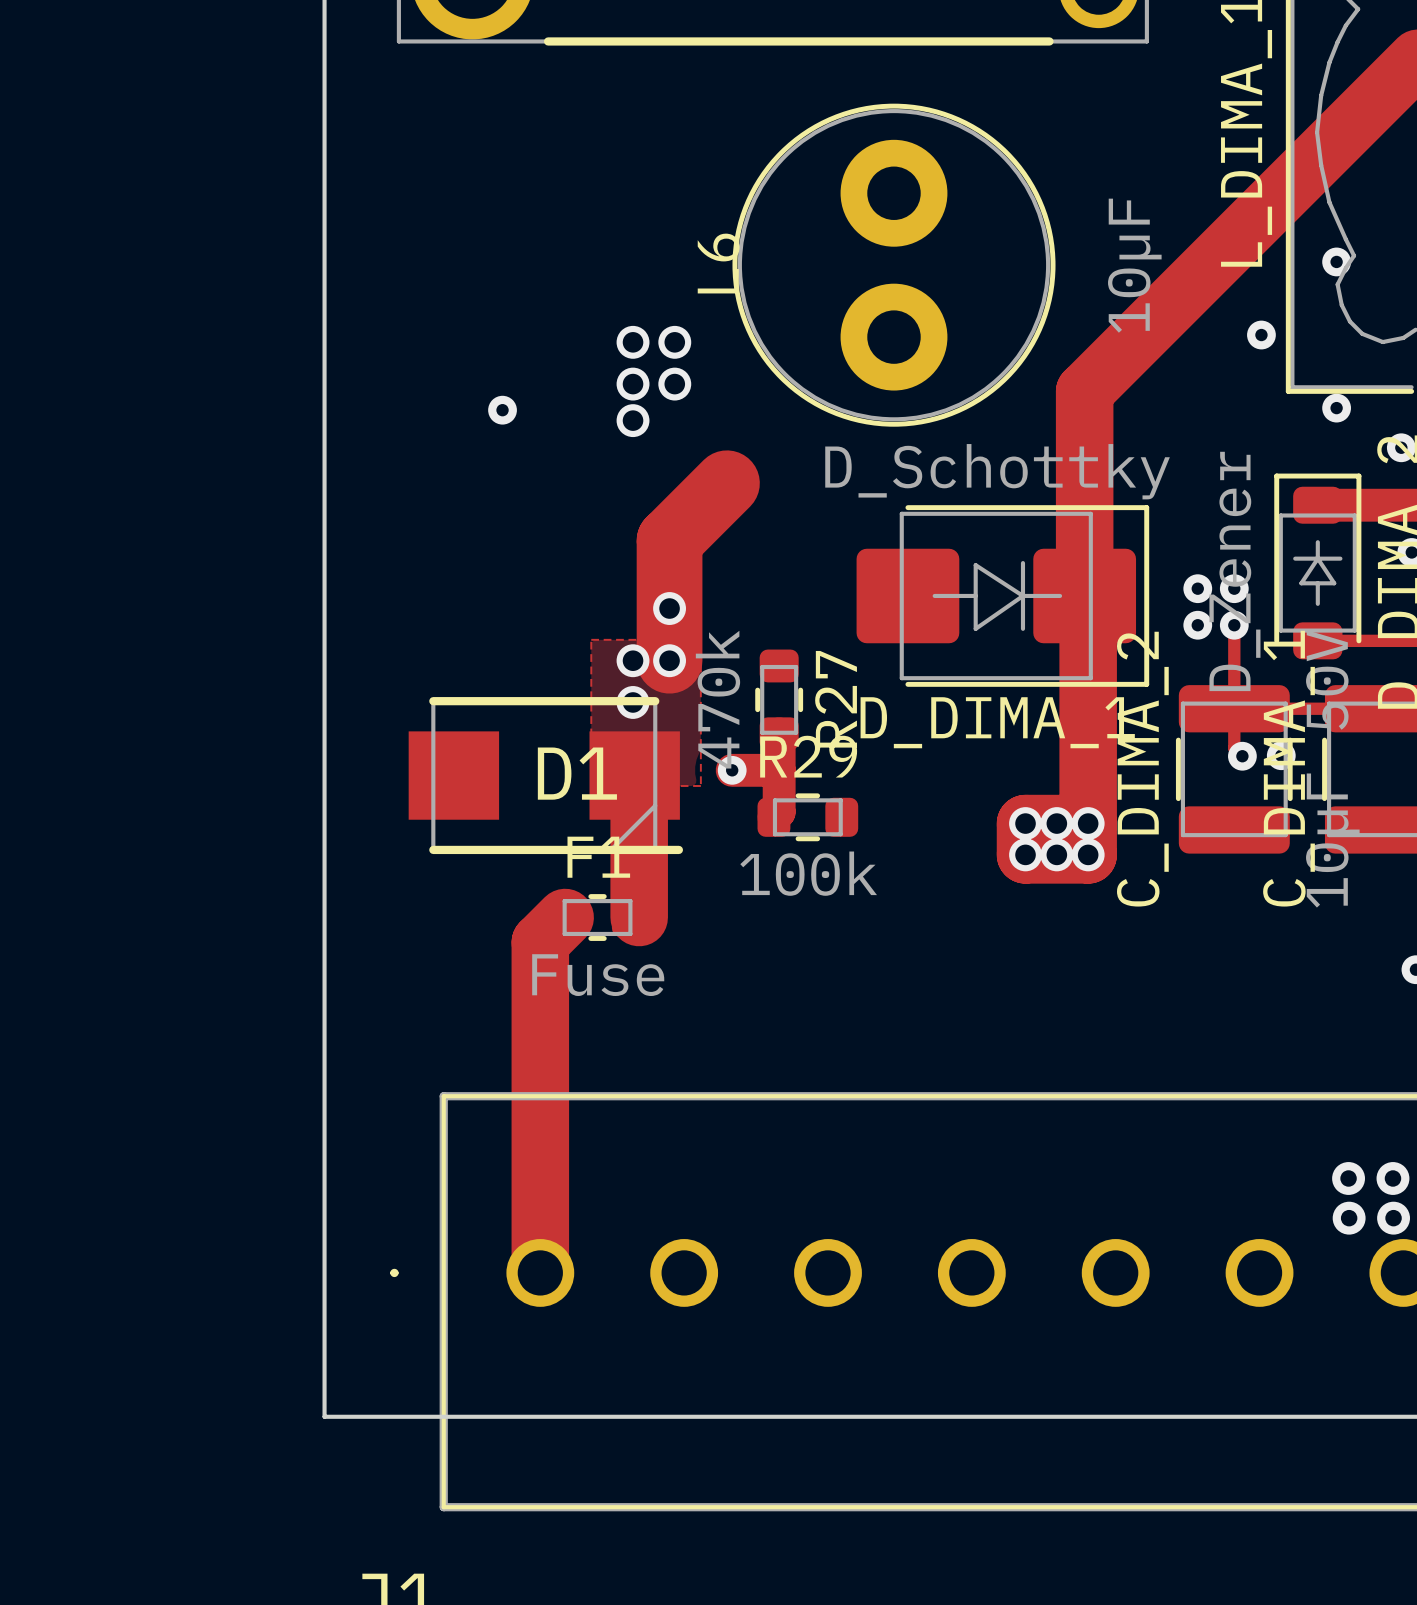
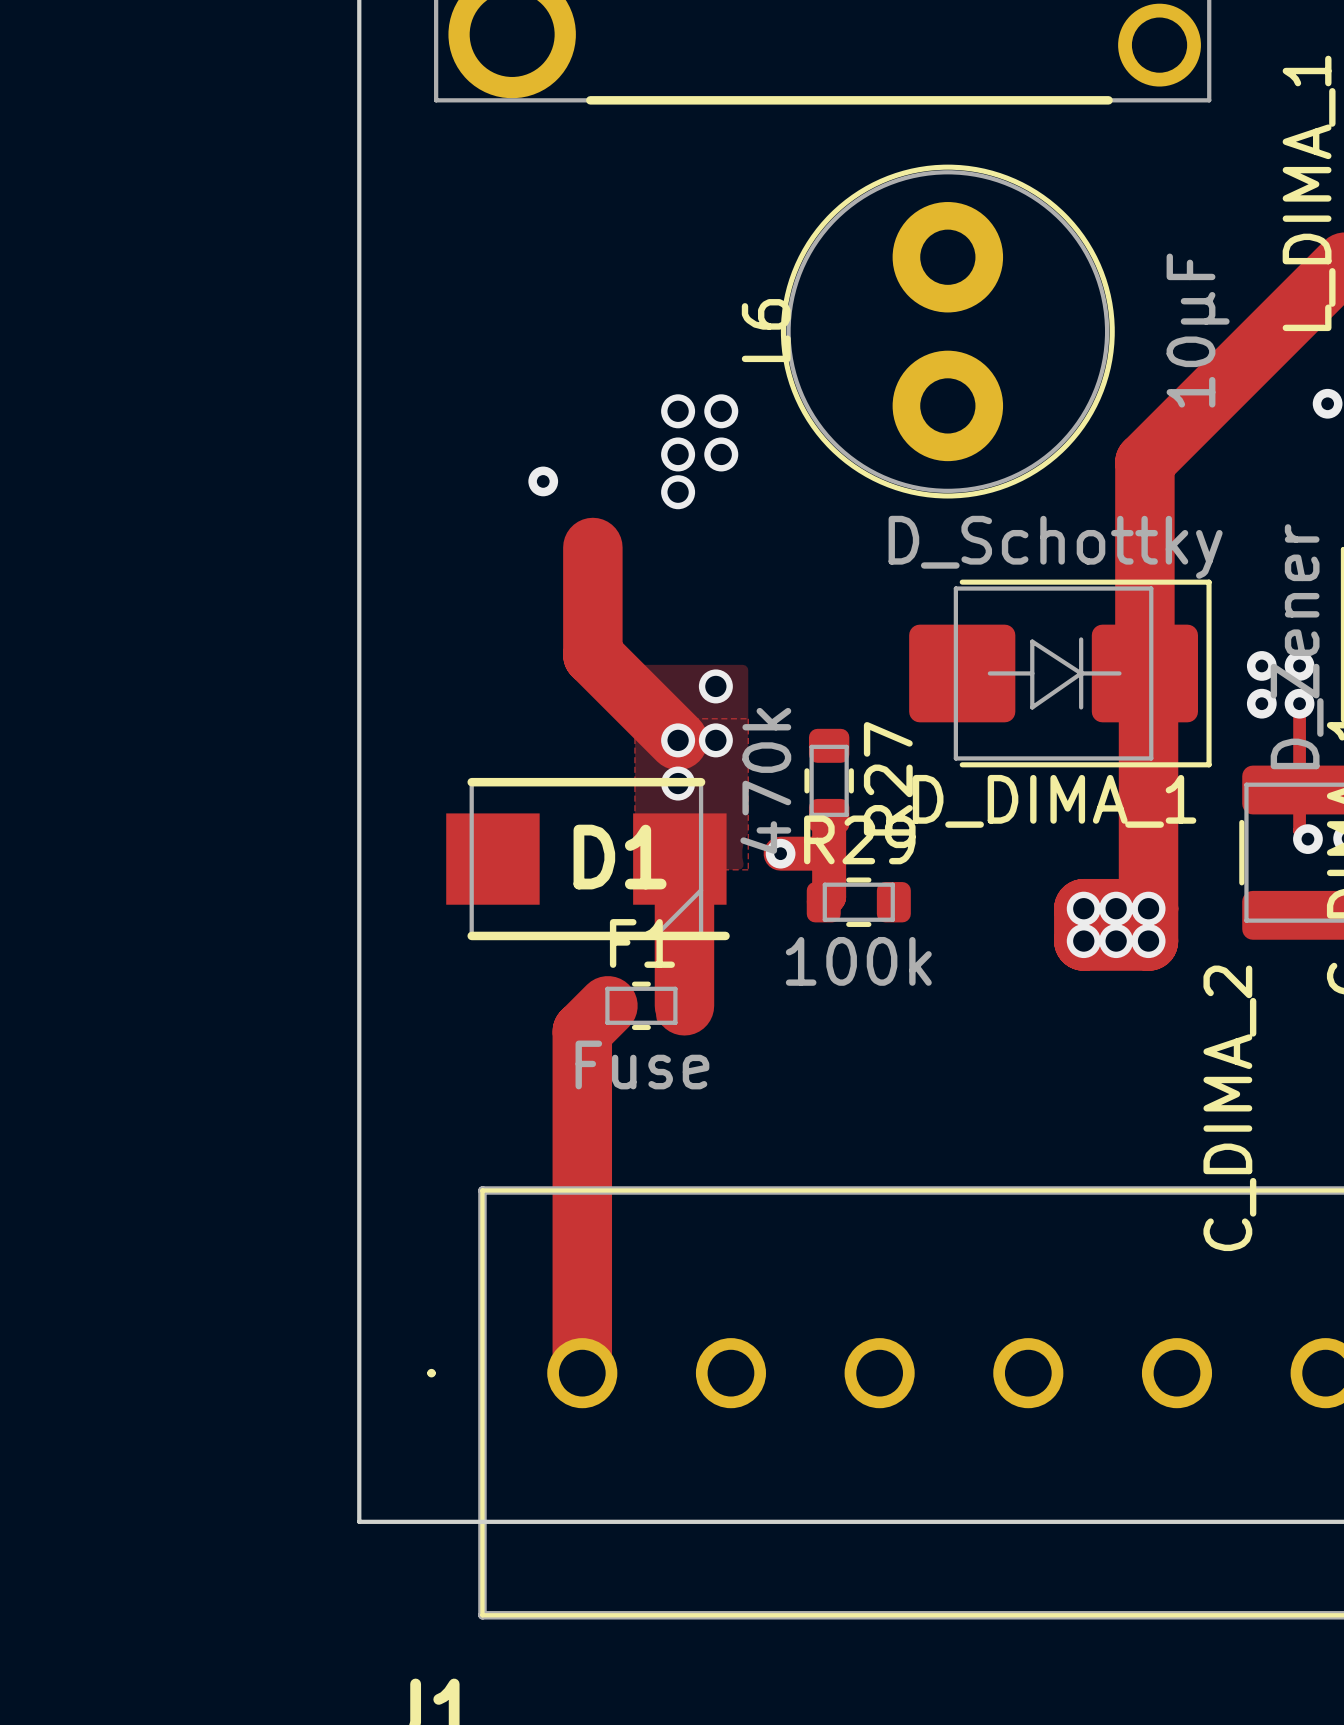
track: none -> (592, 547) (592, 655) (678, 740)
track: (726, 483) (669, 540) (669, 660) -> none
C_DIMA_2 name position: C_DIMA_2 (1142, 769) -> C_DIMA_2 (1229, 1108)

